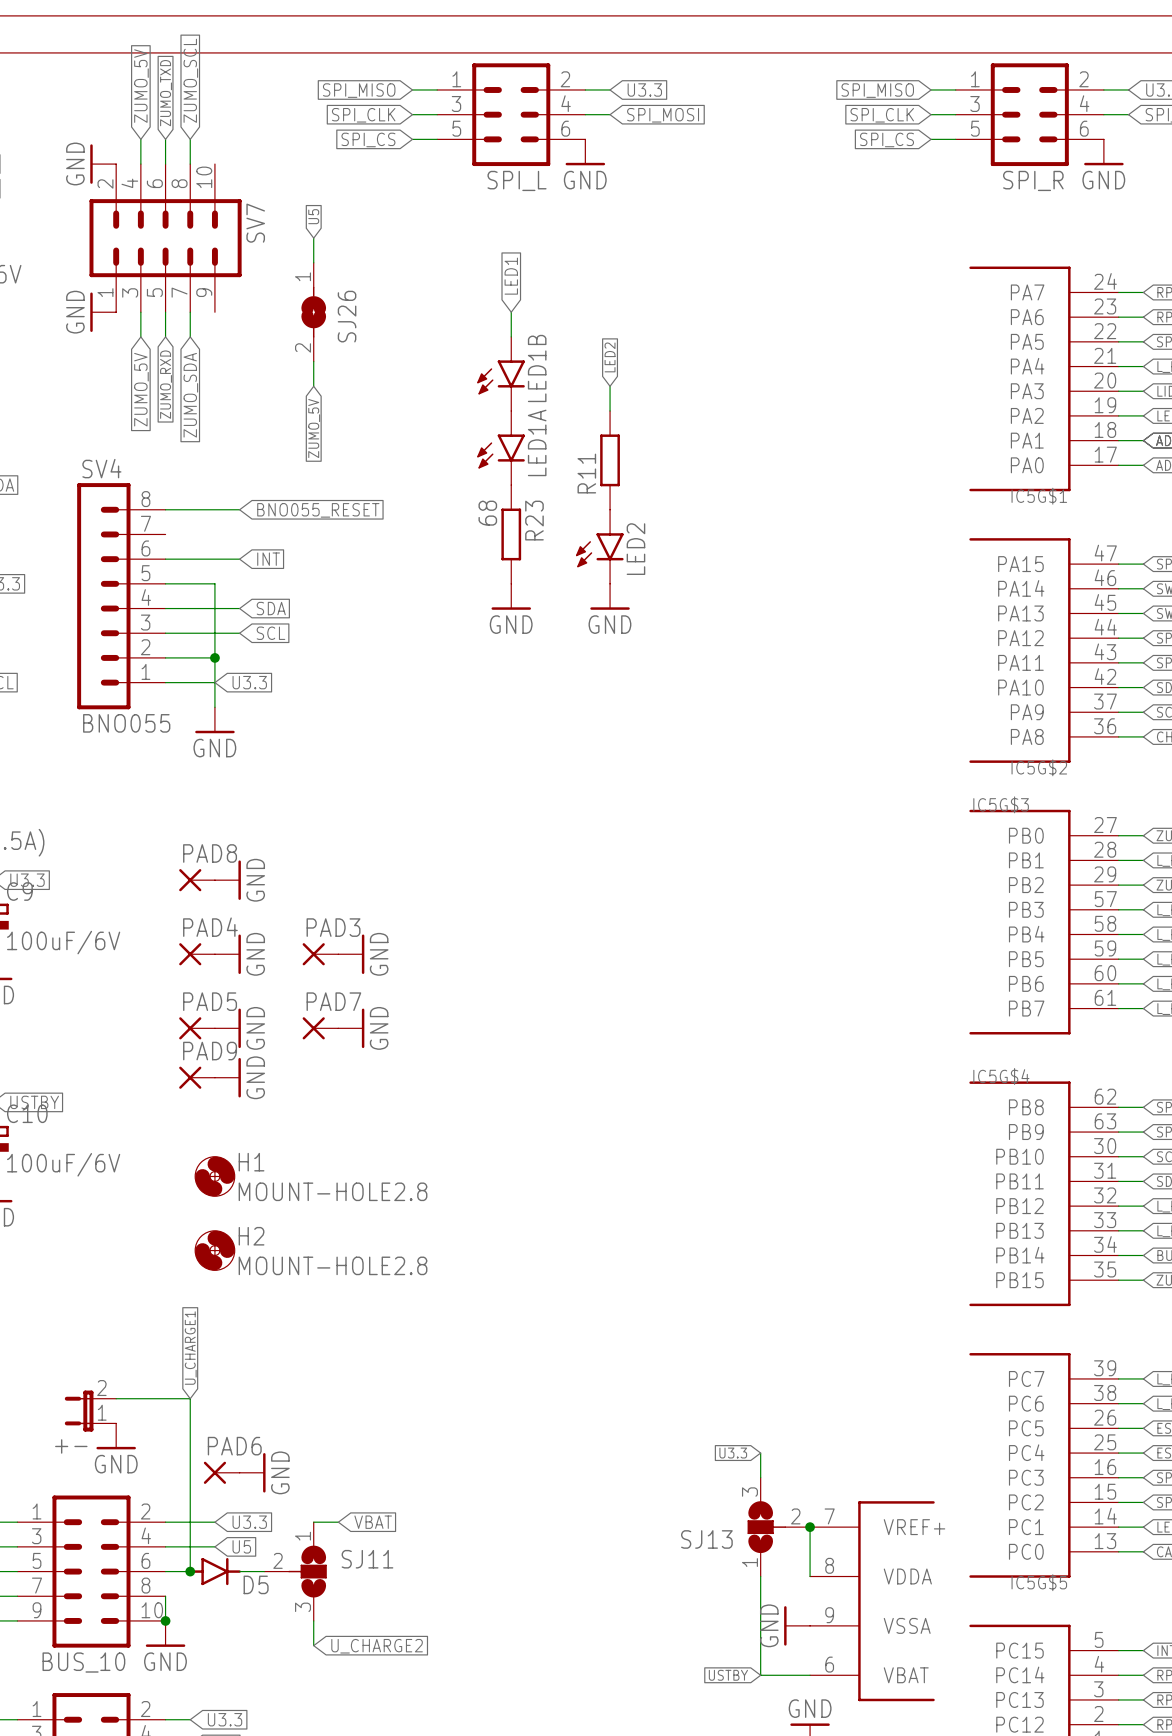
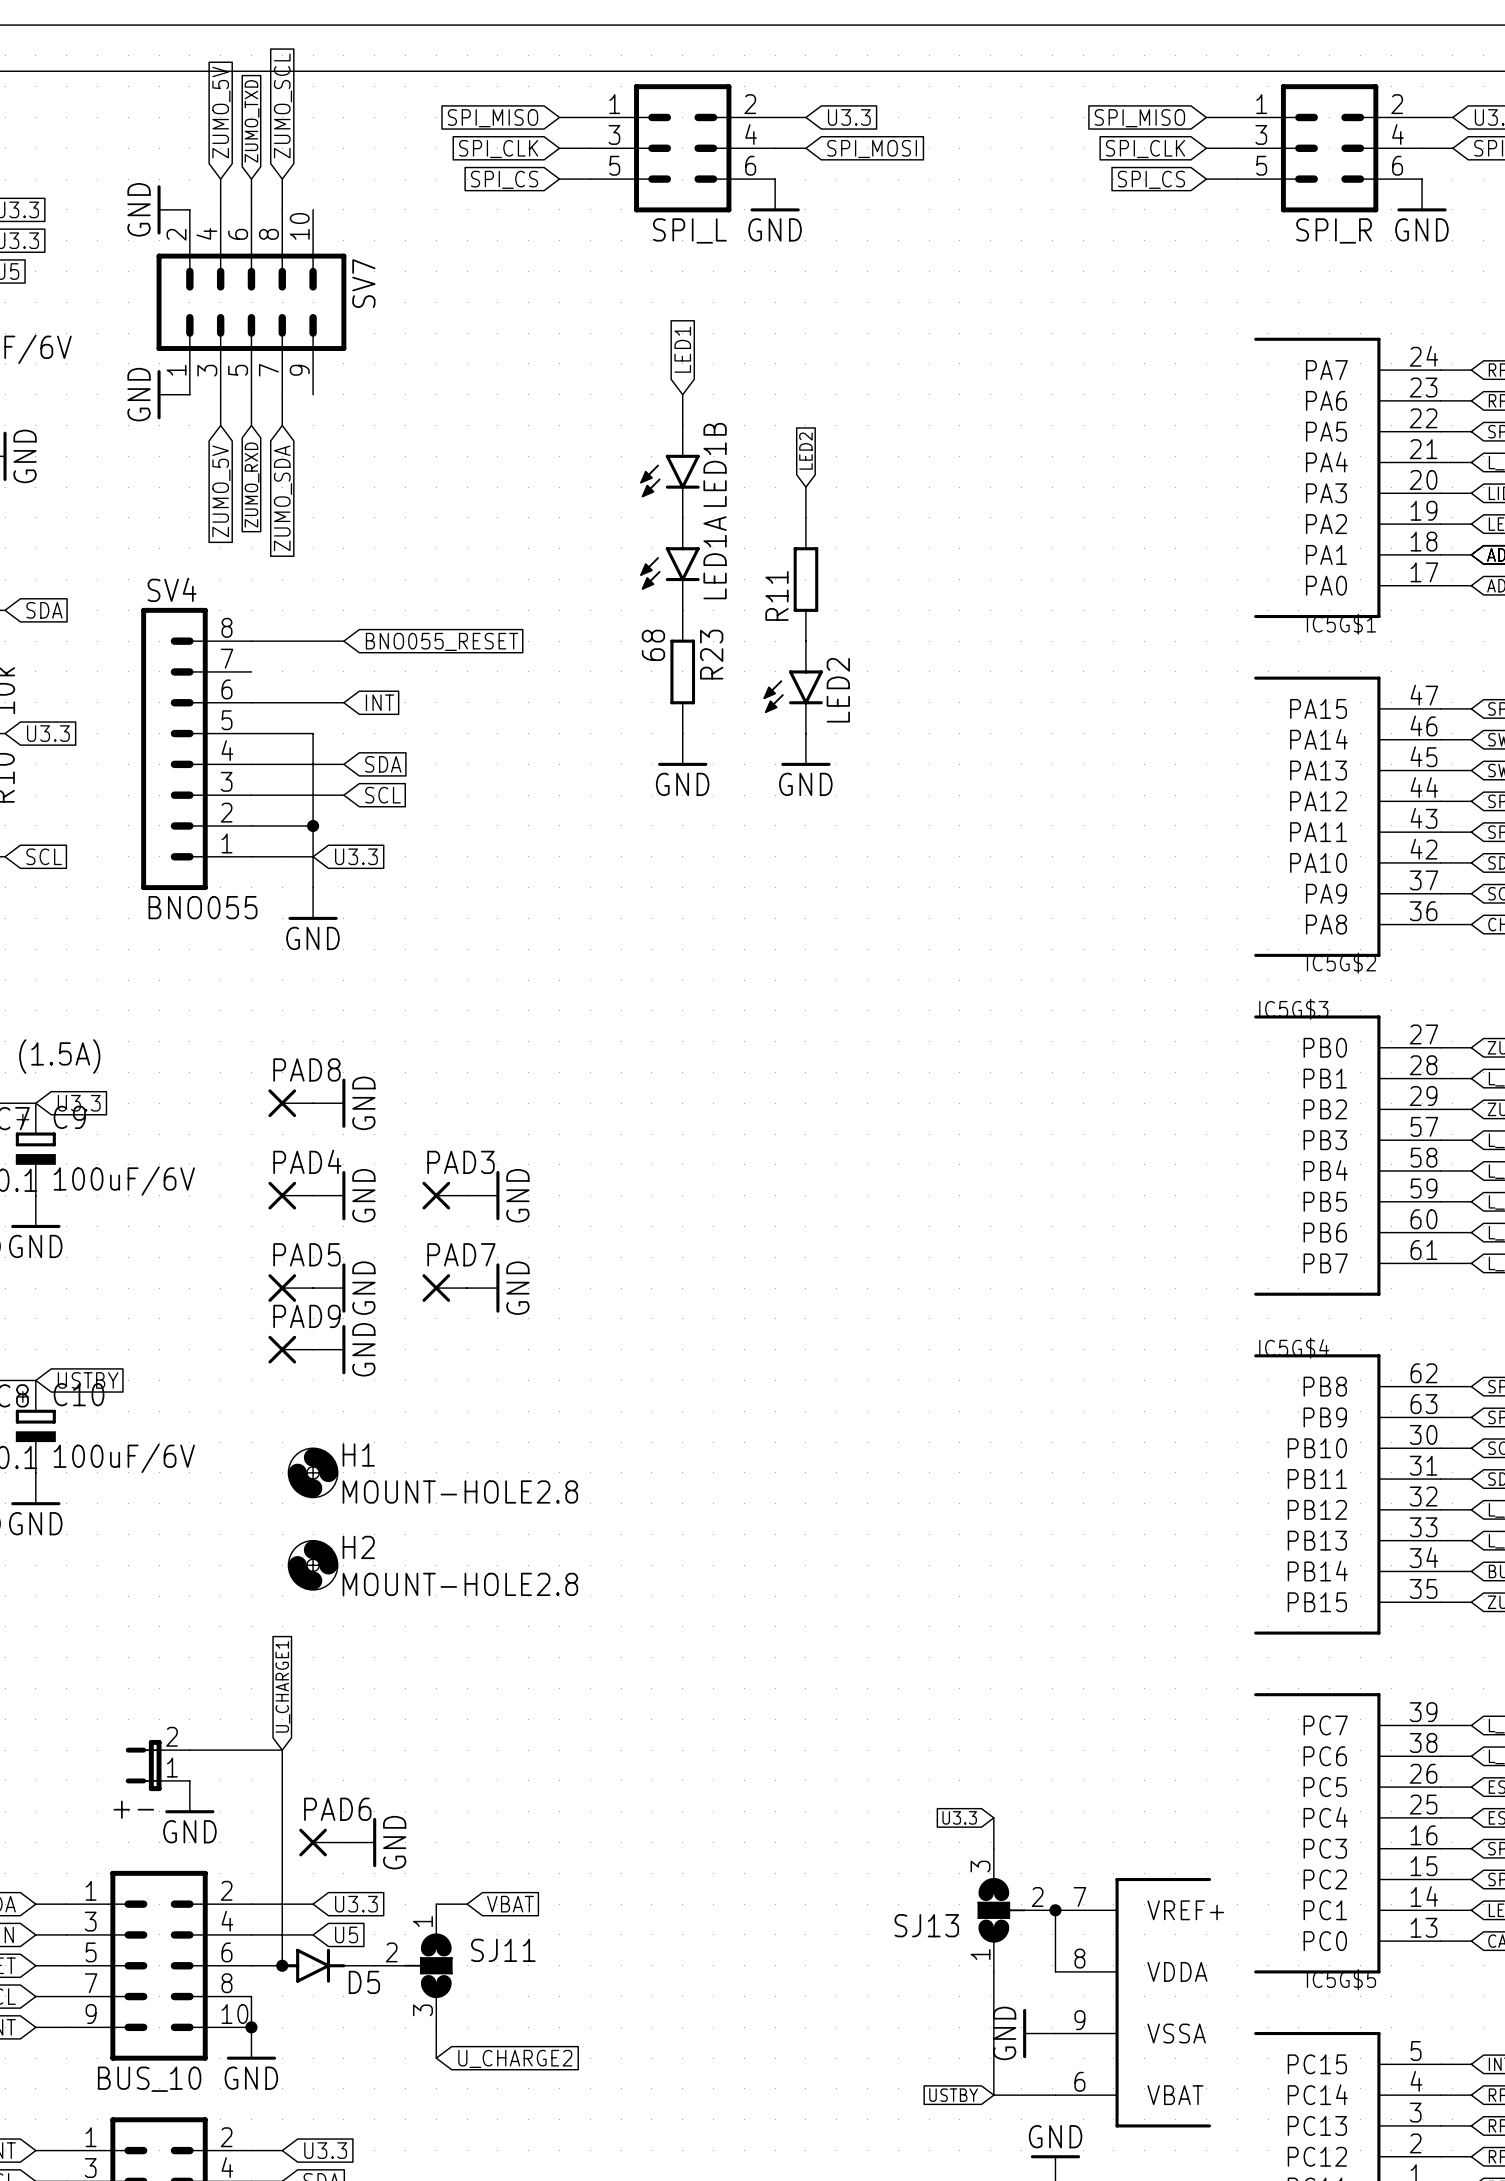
global label: U5 (313, 216) -> none
wire: (313, 238) (313, 262) -> none
SJ26: (313, 312) -> none
wire: (313, 361) (313, 386) -> none
global label: ZUMO_5V (314, 428) -> none

